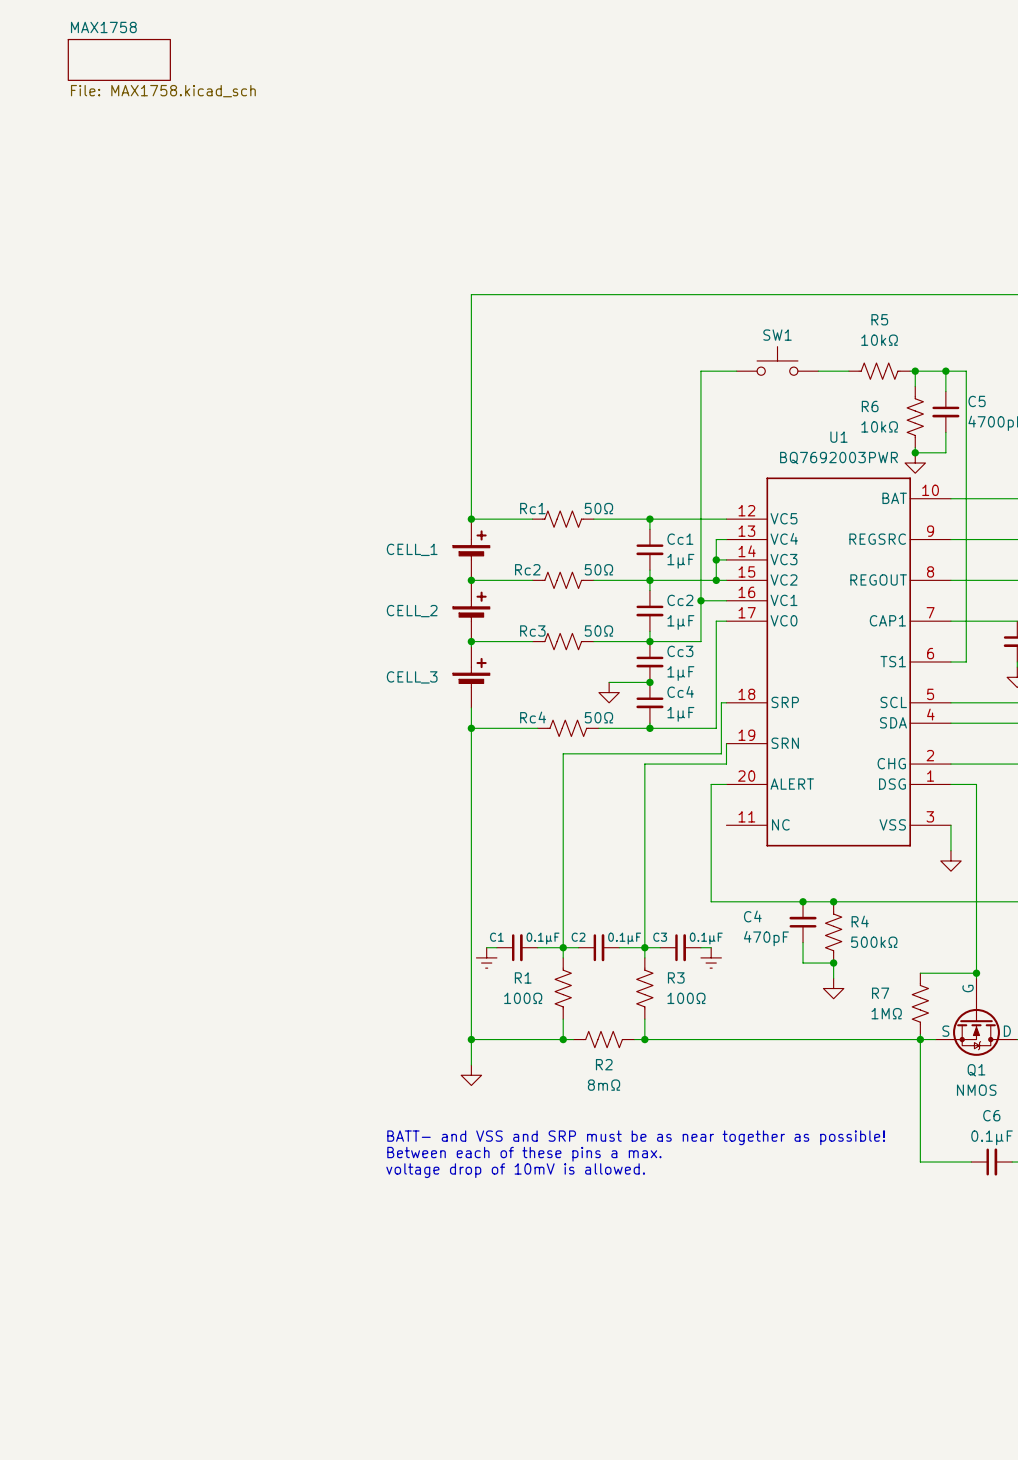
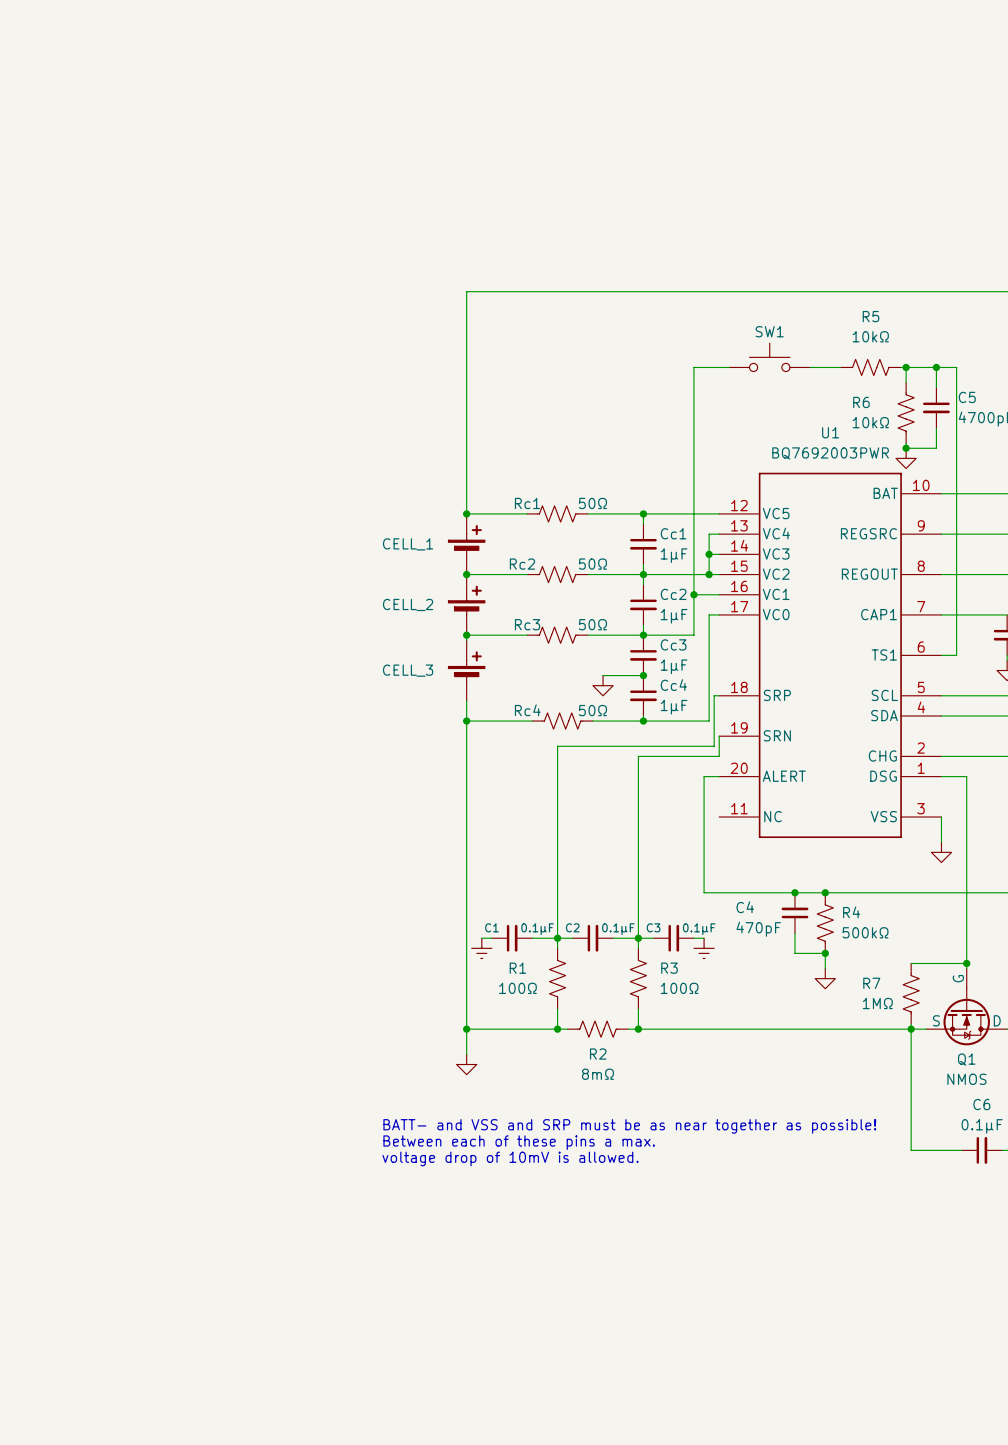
sheet MAX1758: File: MAX1758.kicad_sch (119, 59) -> none

